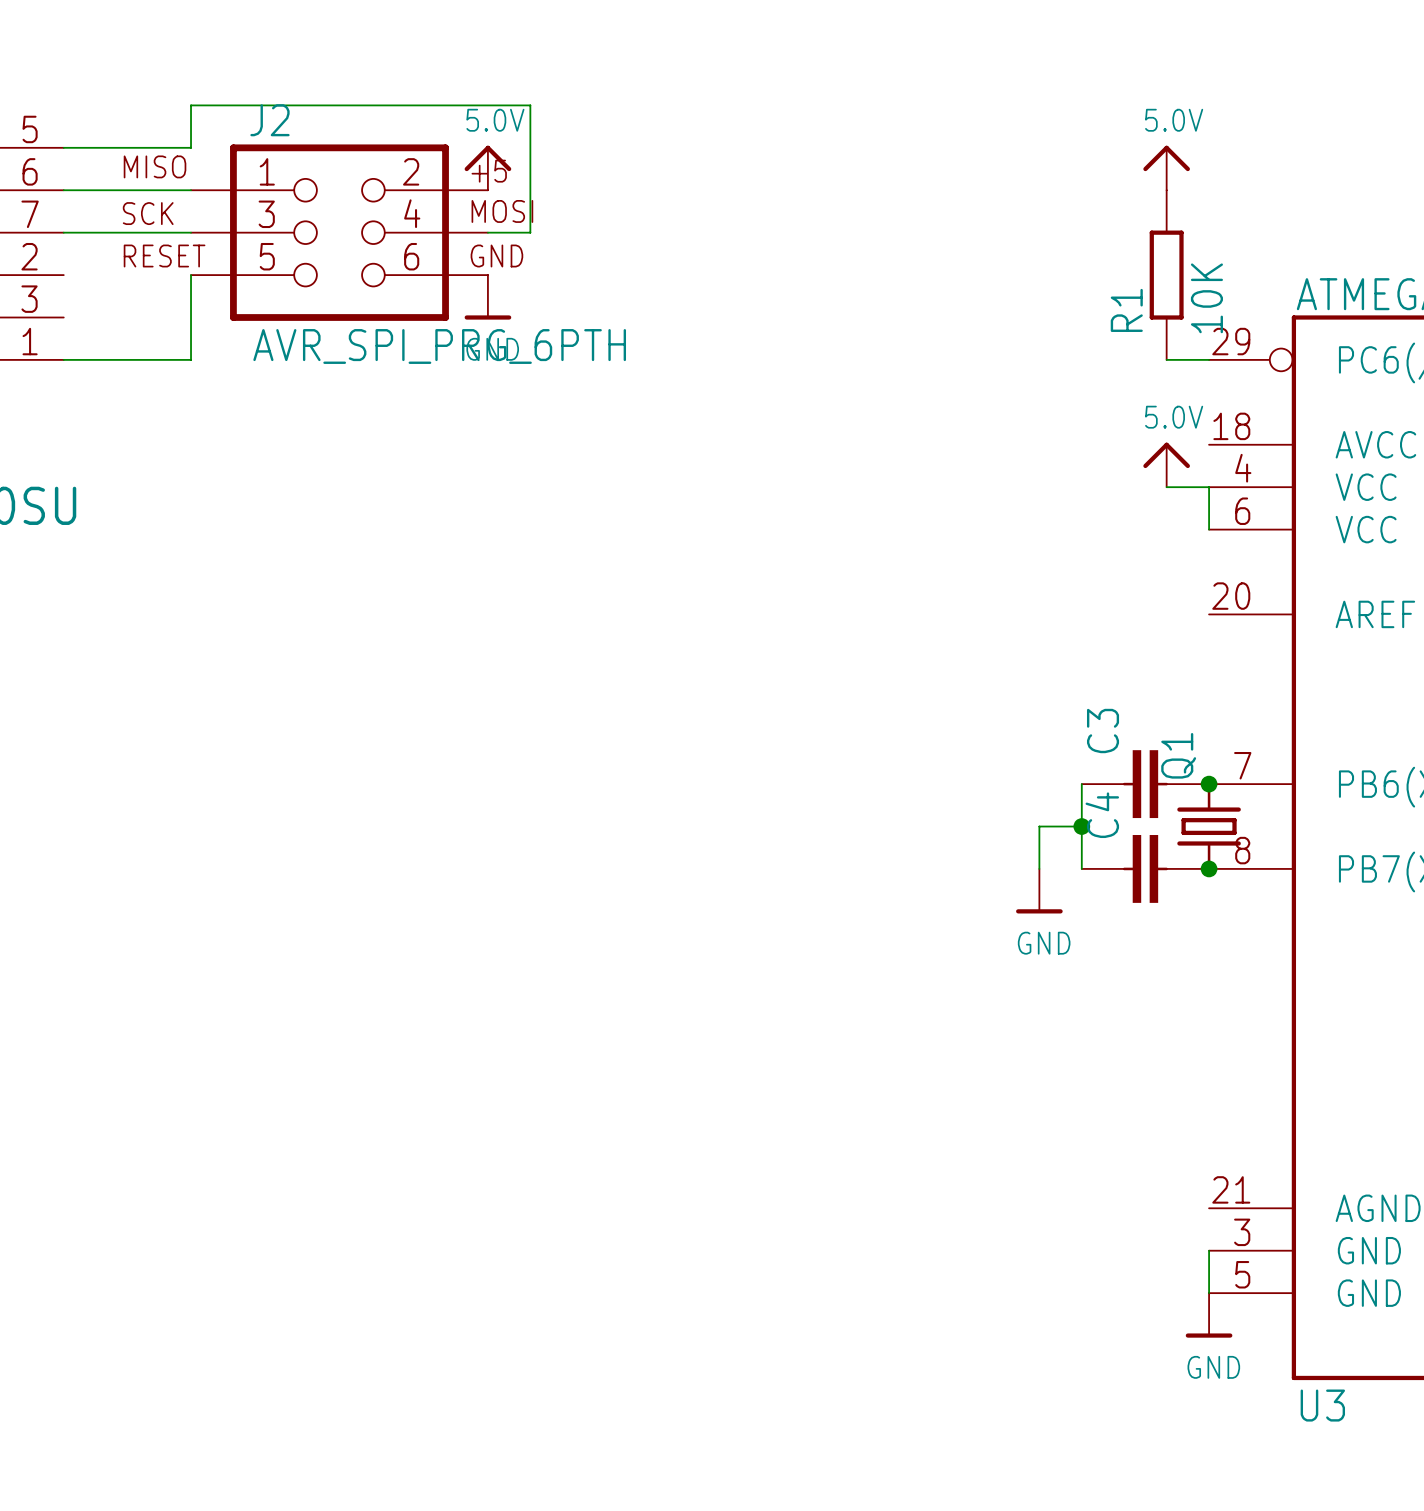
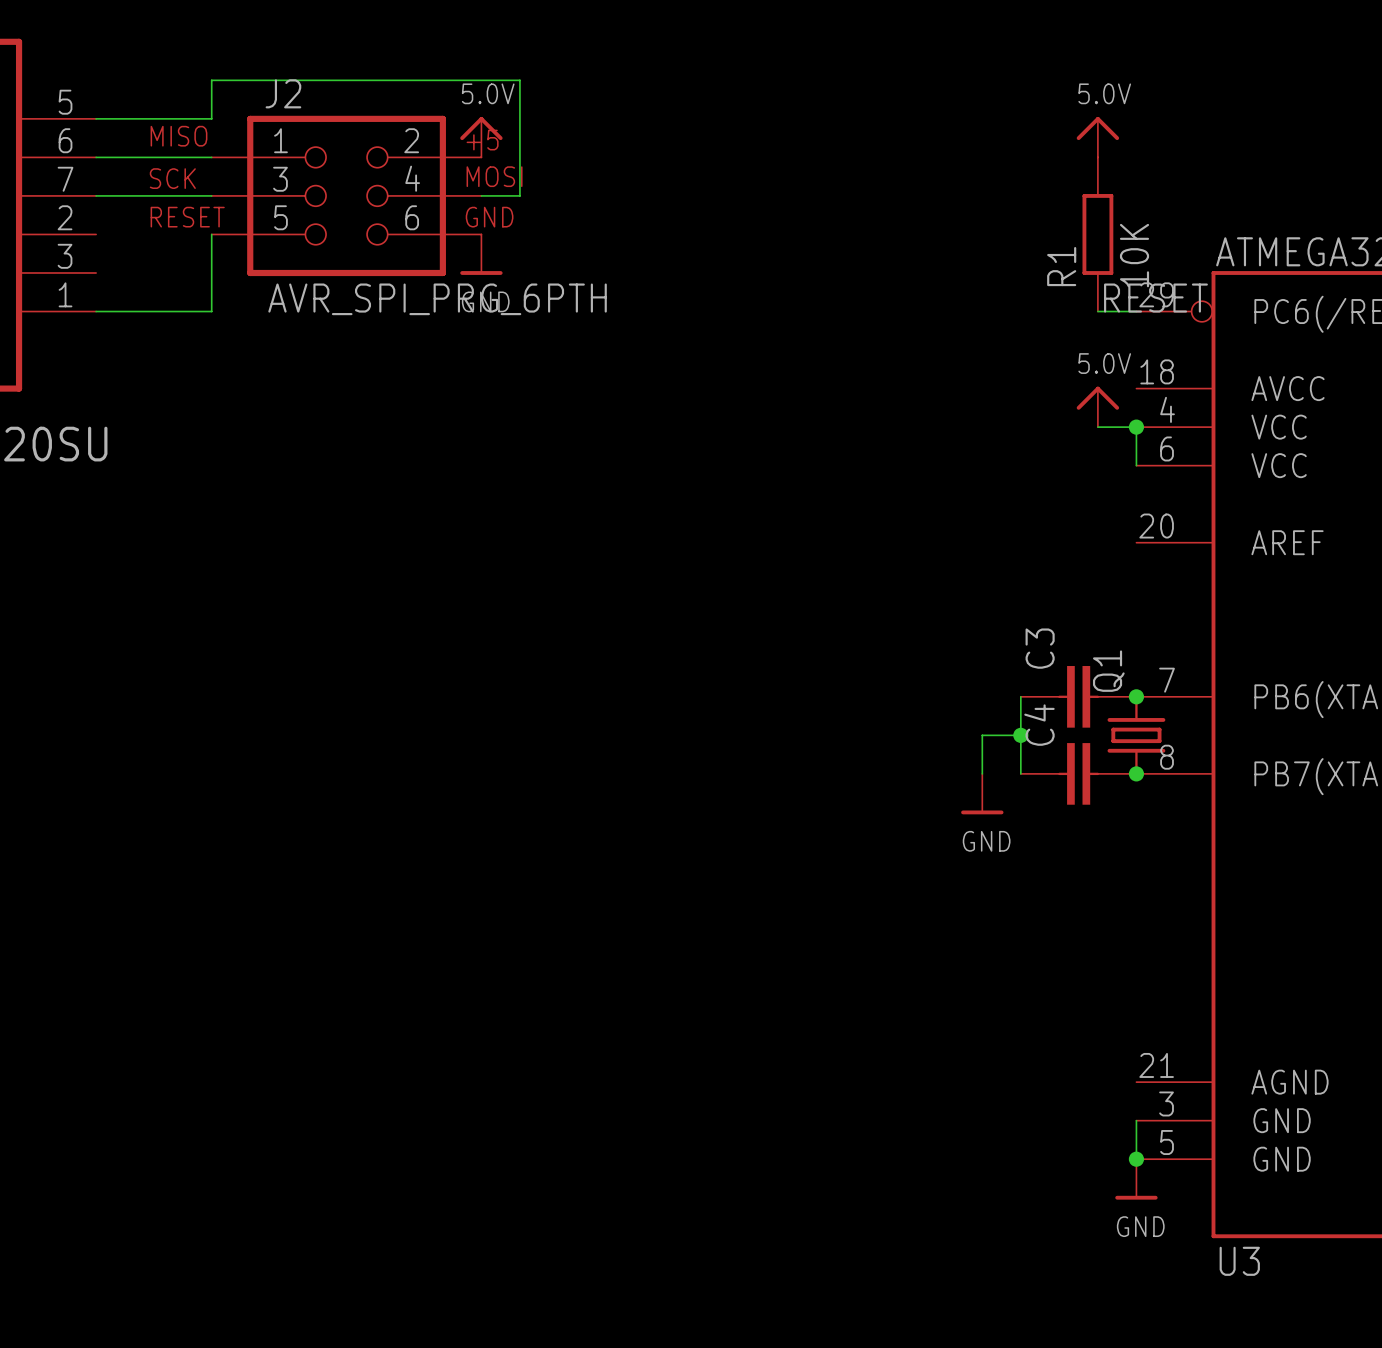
label: none -> RESET (1155, 298)
junction: none -> (1136, 427)
junction: none -> (1136, 1159)

